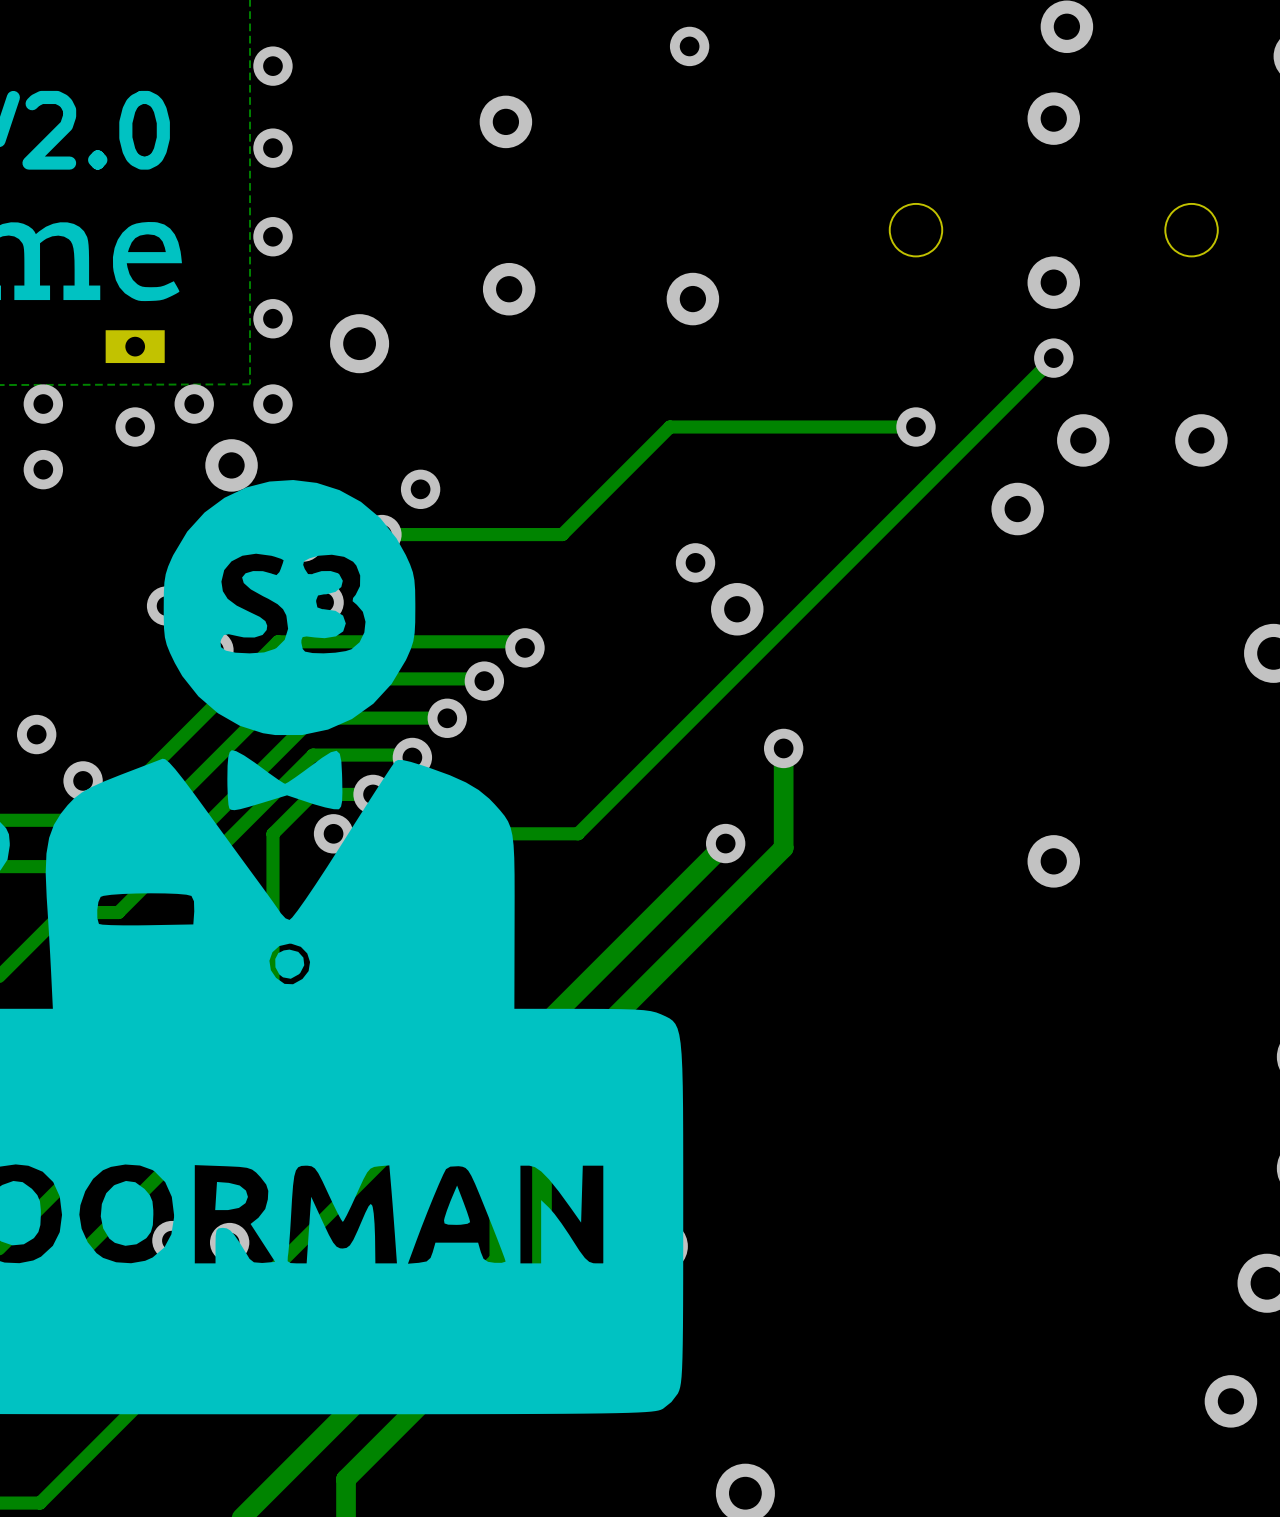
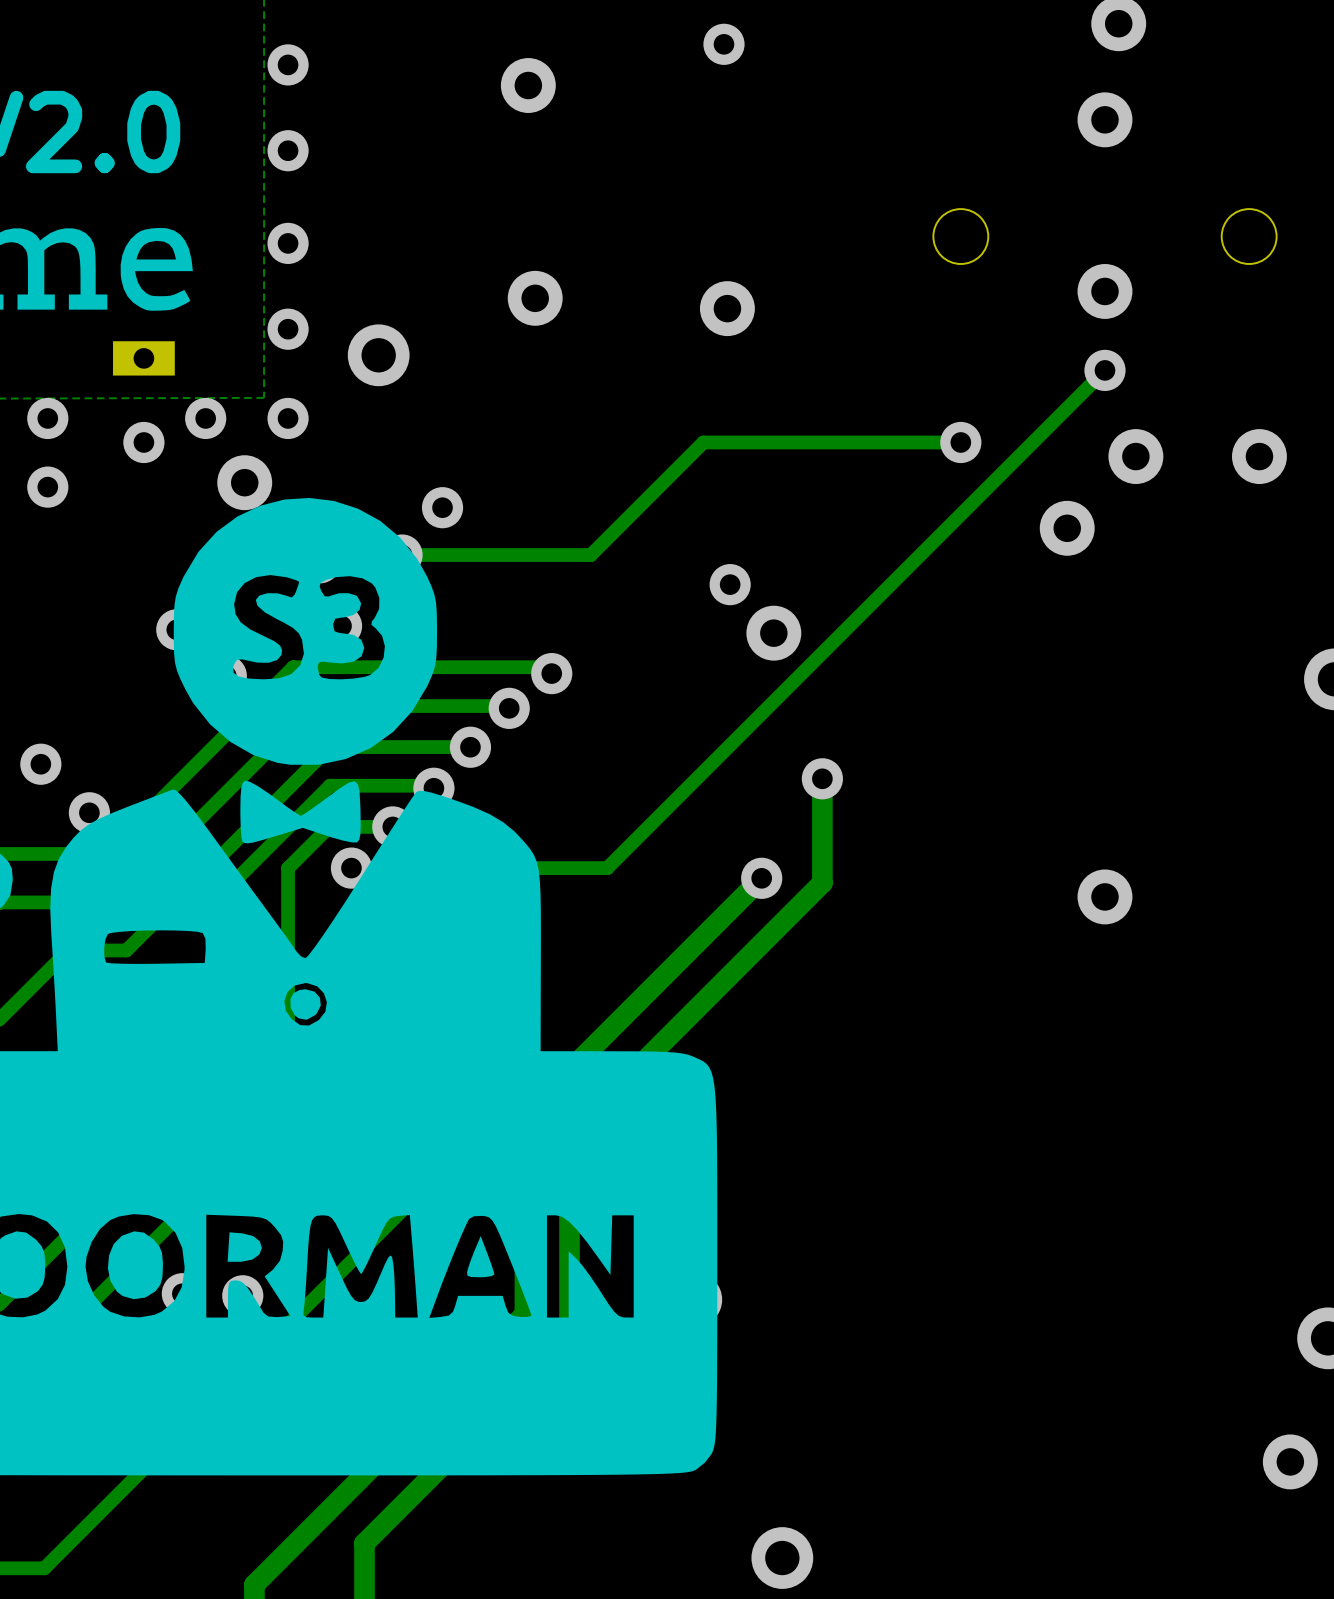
via position: (505, 121) -> (528, 85)

